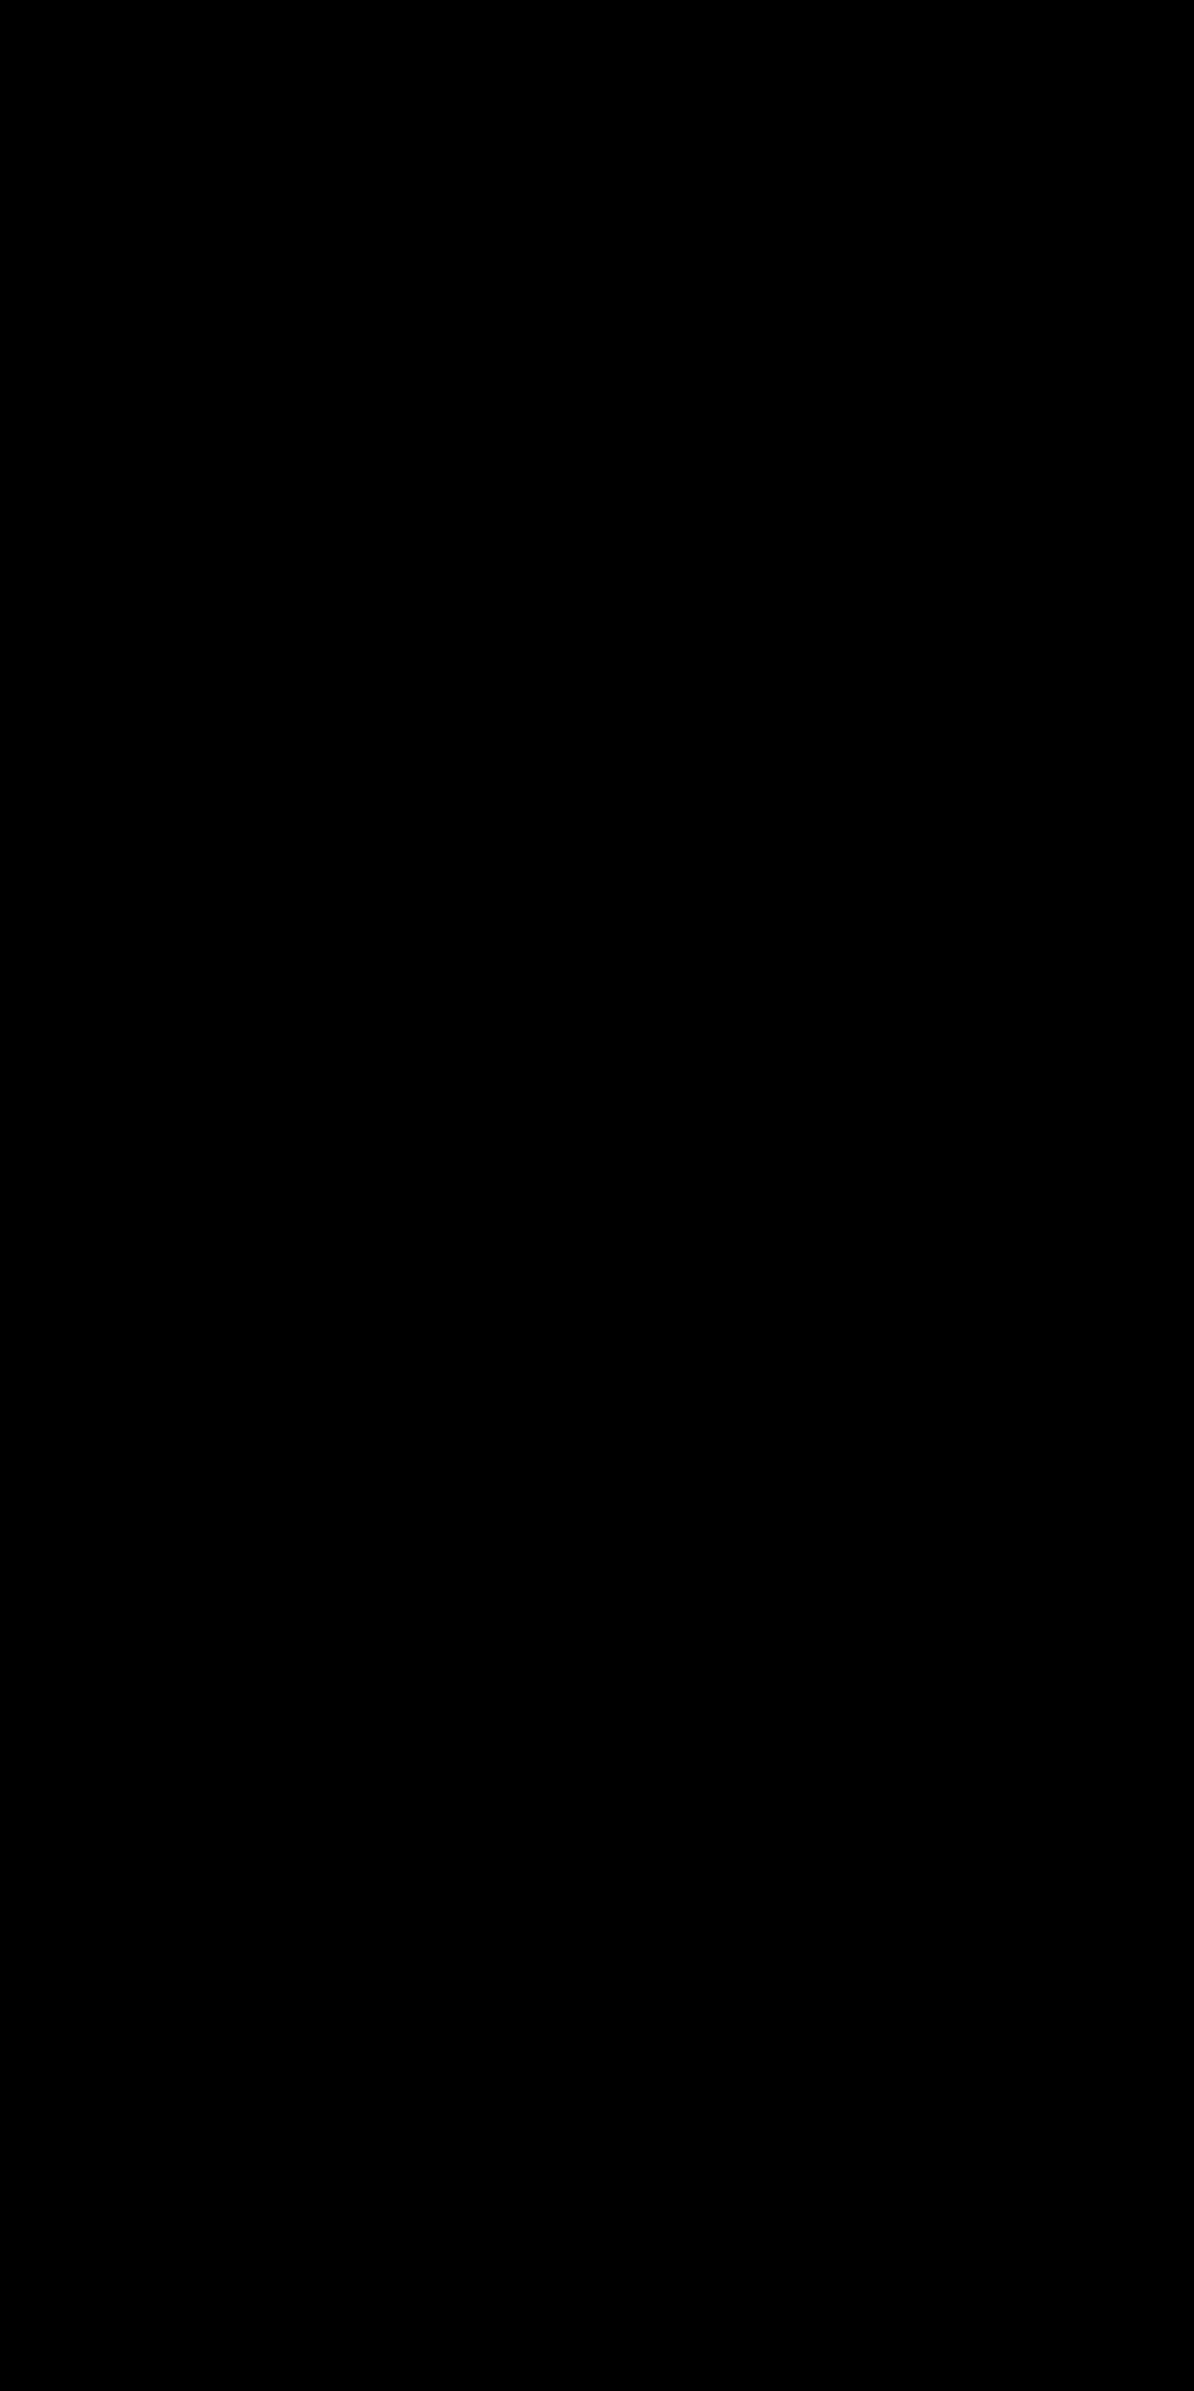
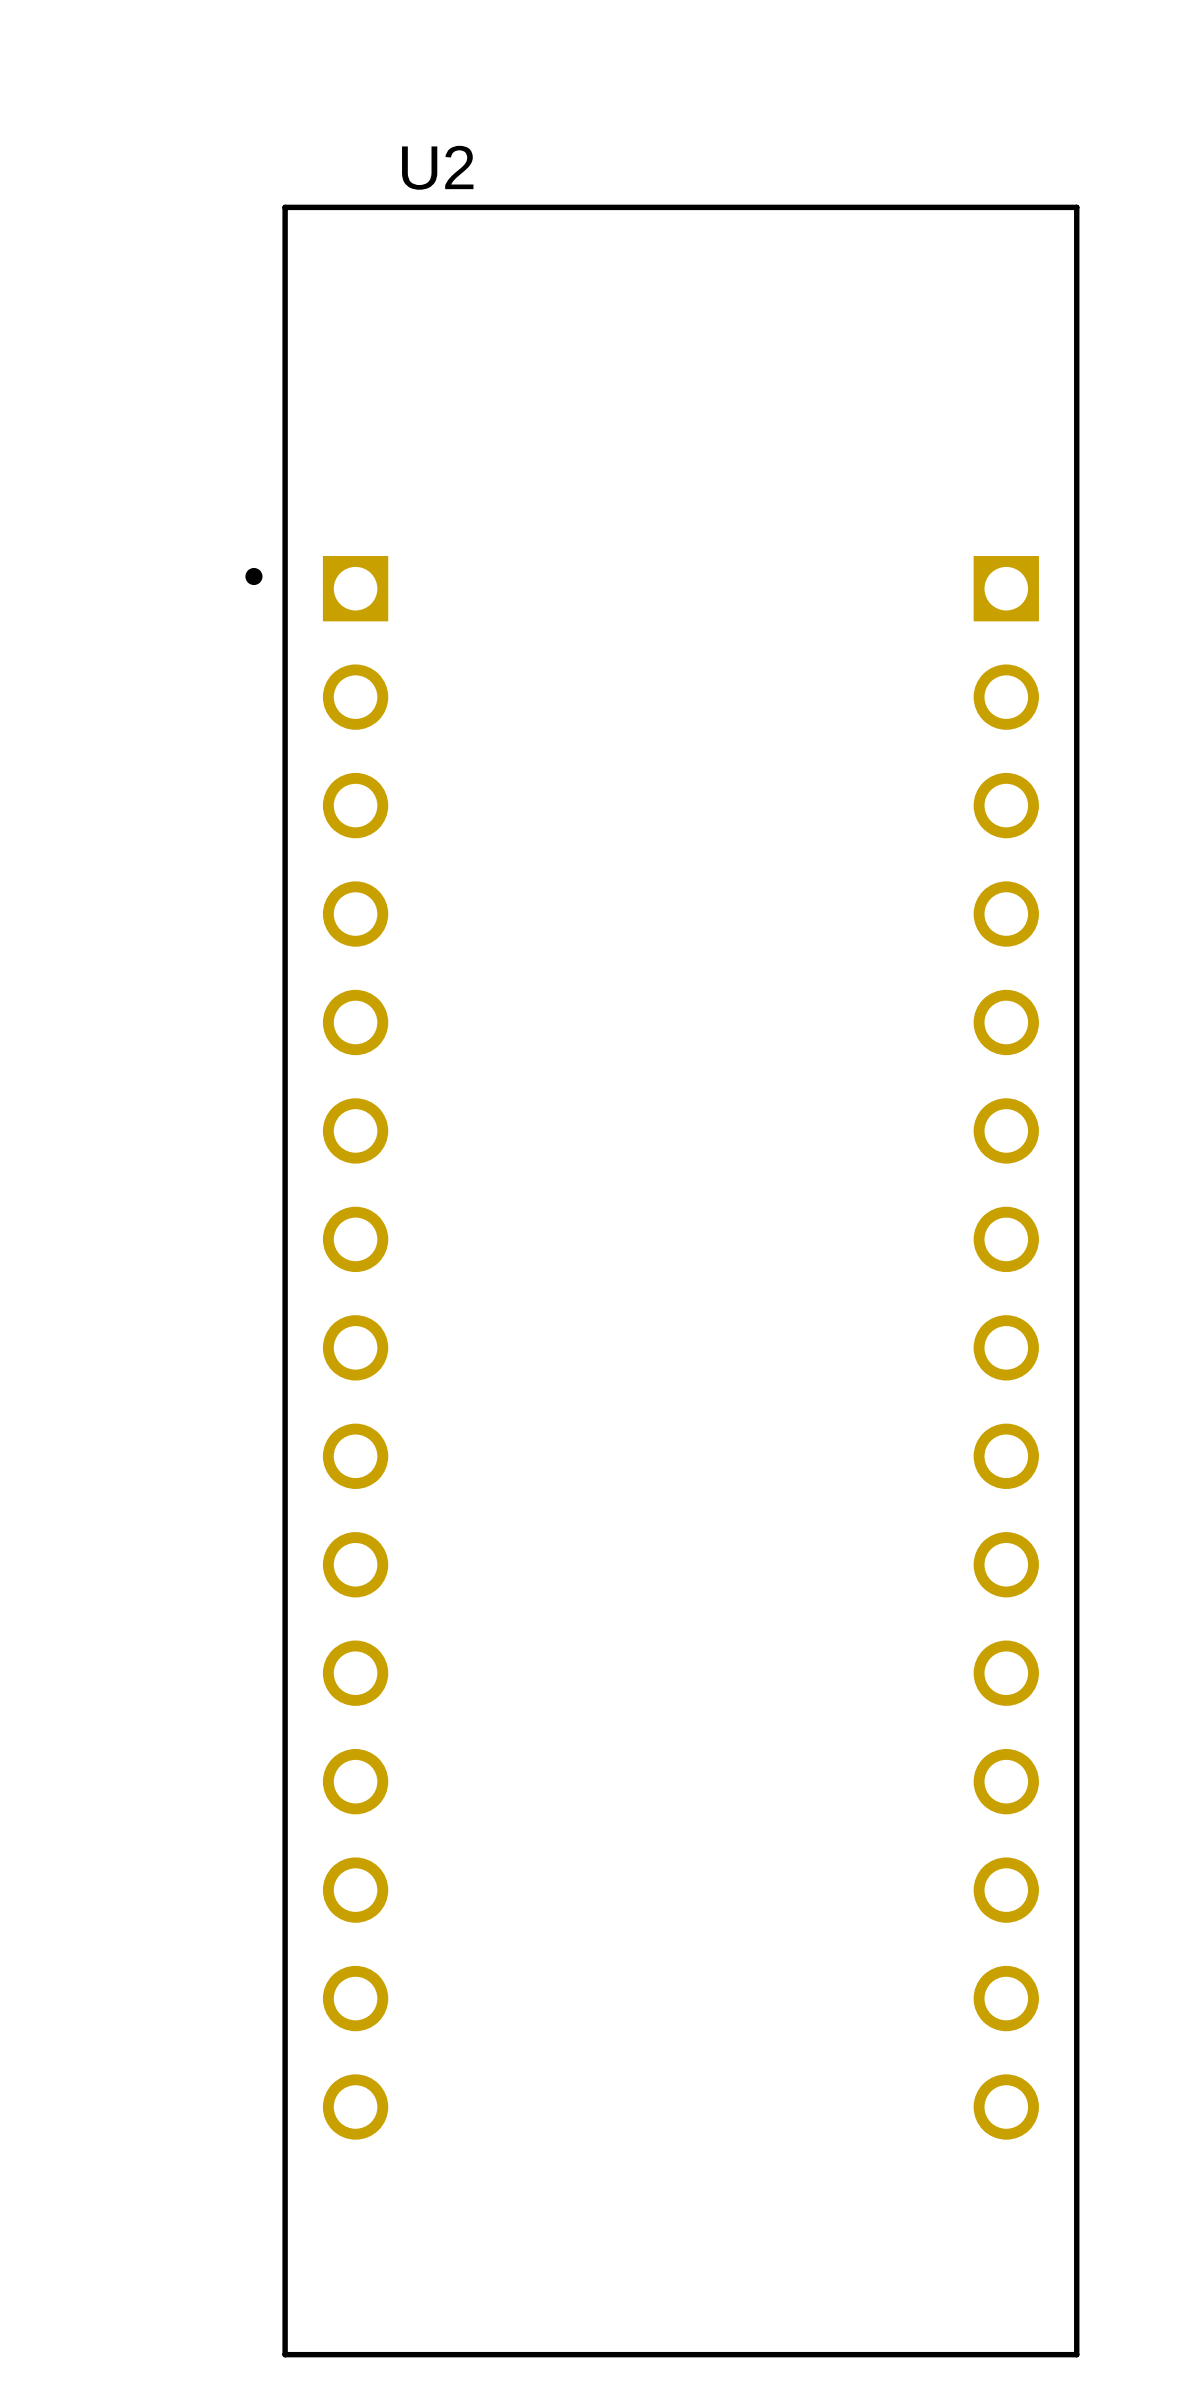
U2: none -> (662, 1281)

